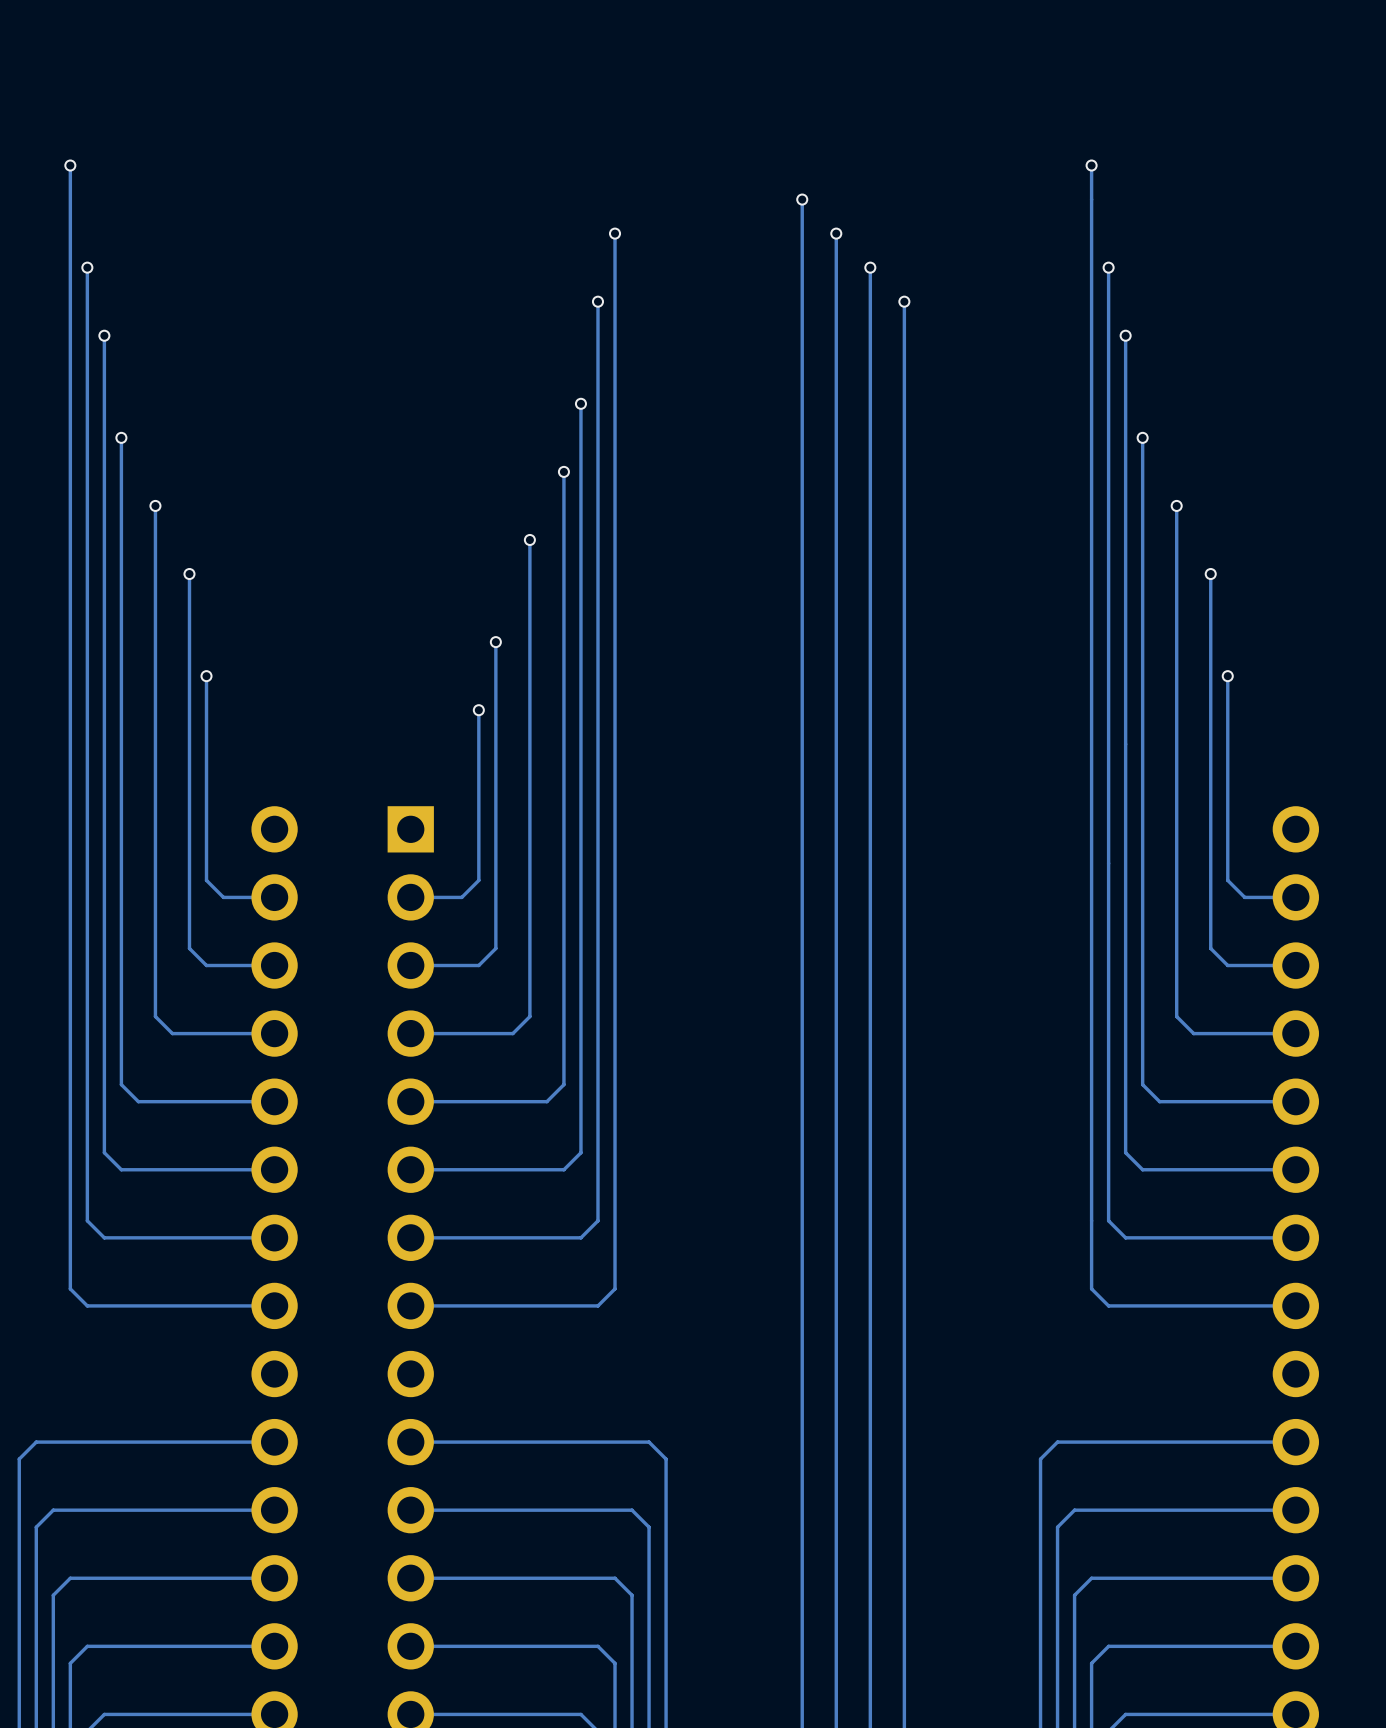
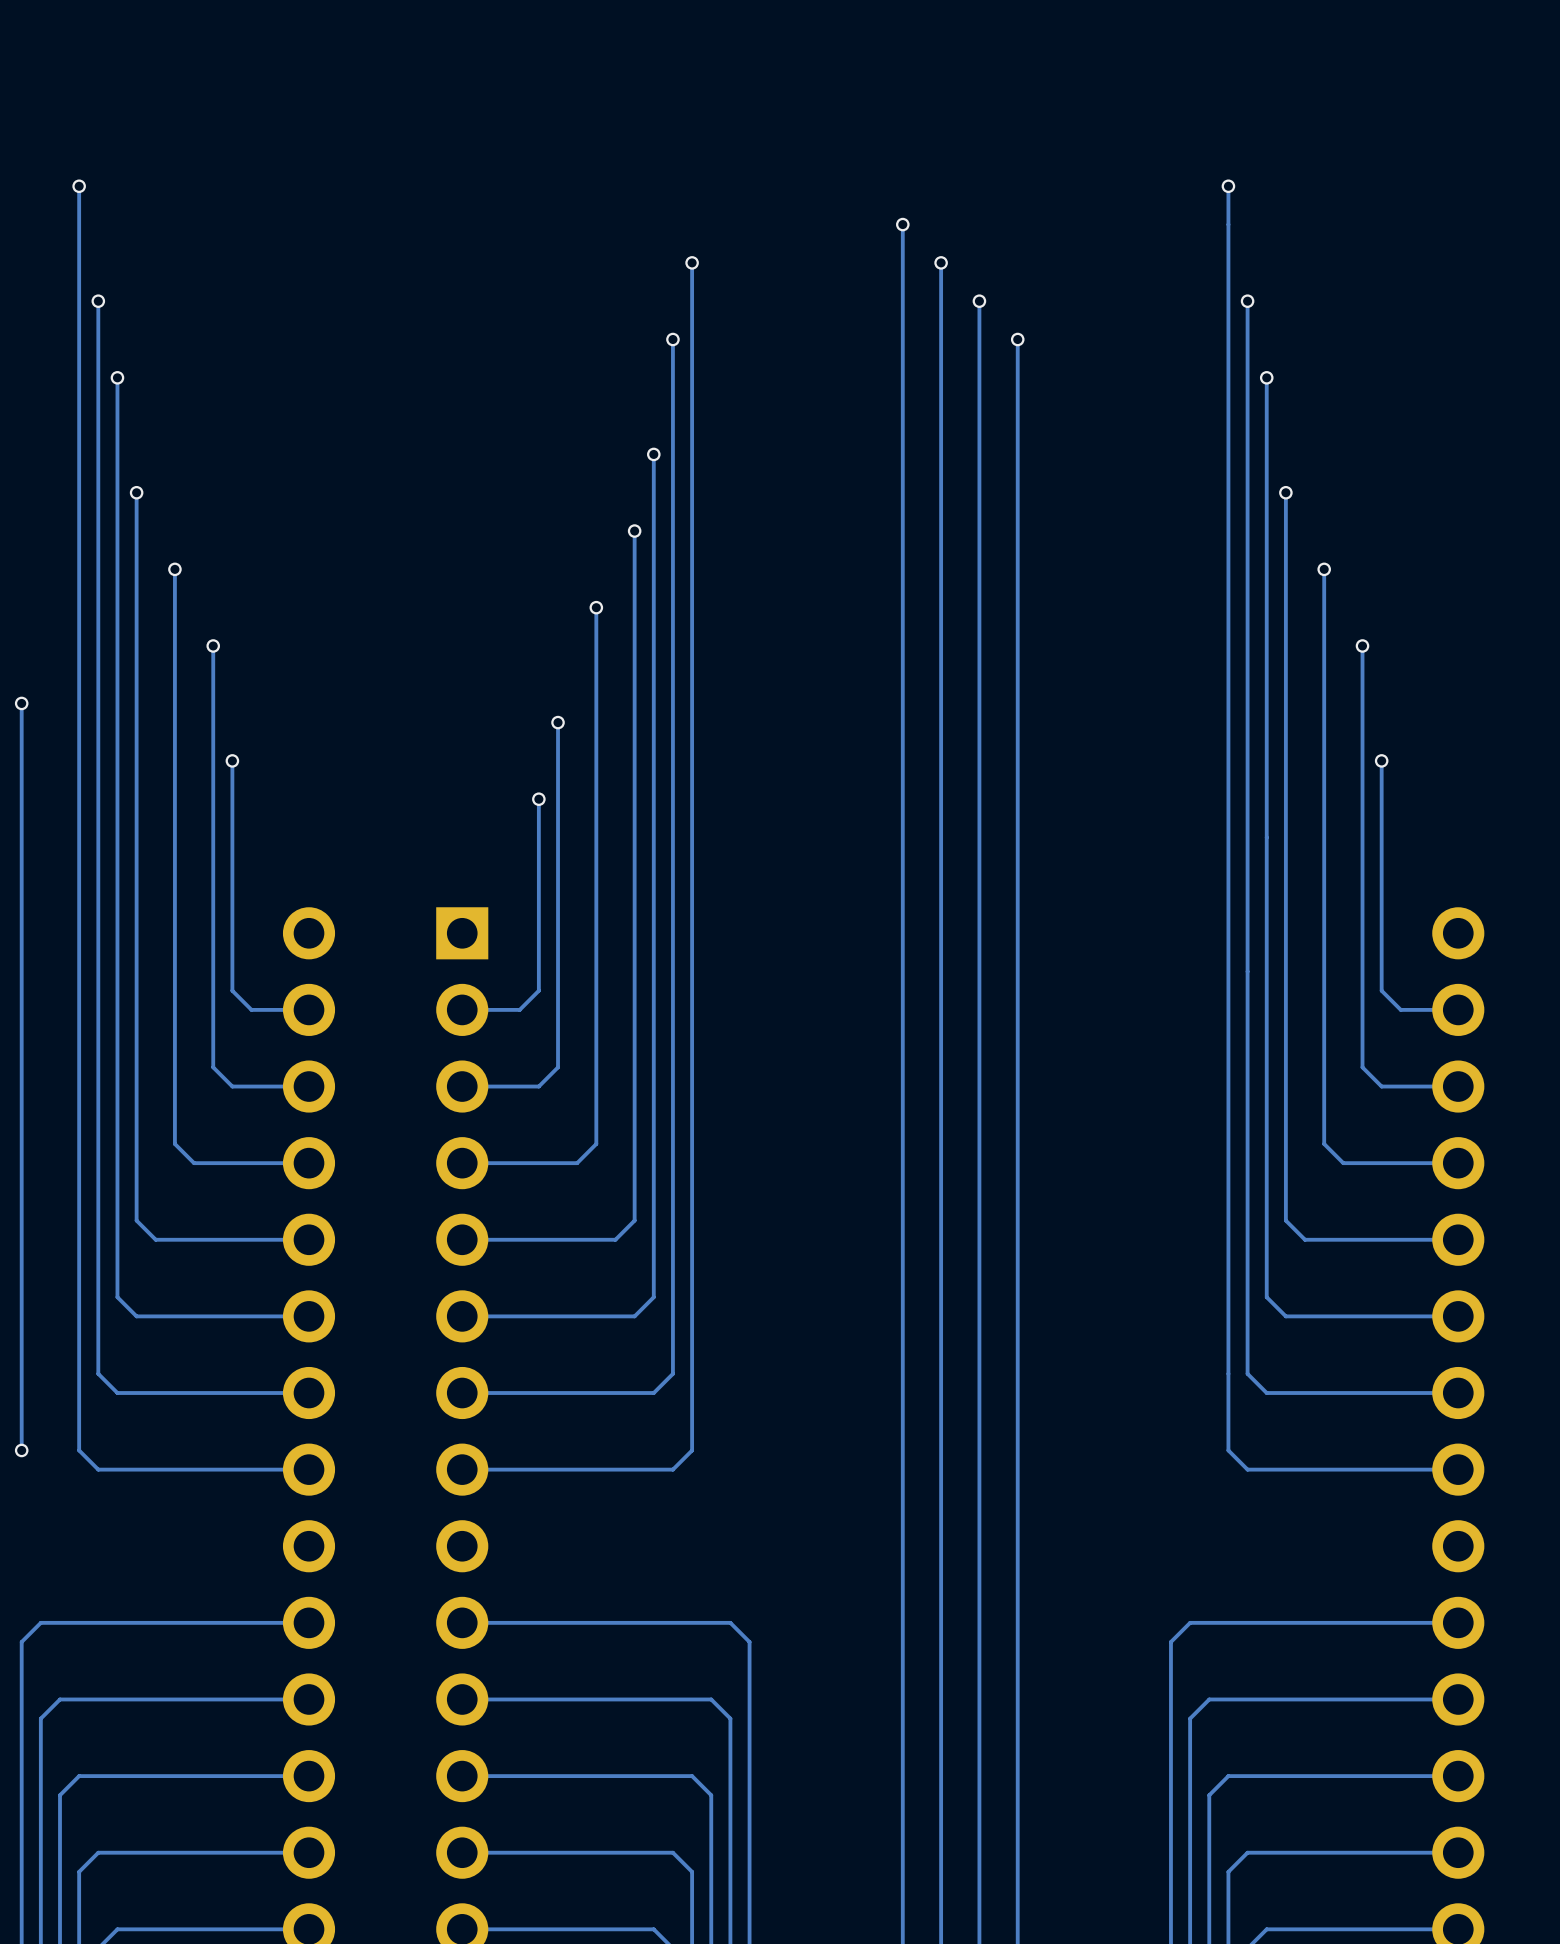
track: none -> (21, 703) (21, 1450)
via: none -> (21, 703)
via: none -> (21, 1450)

